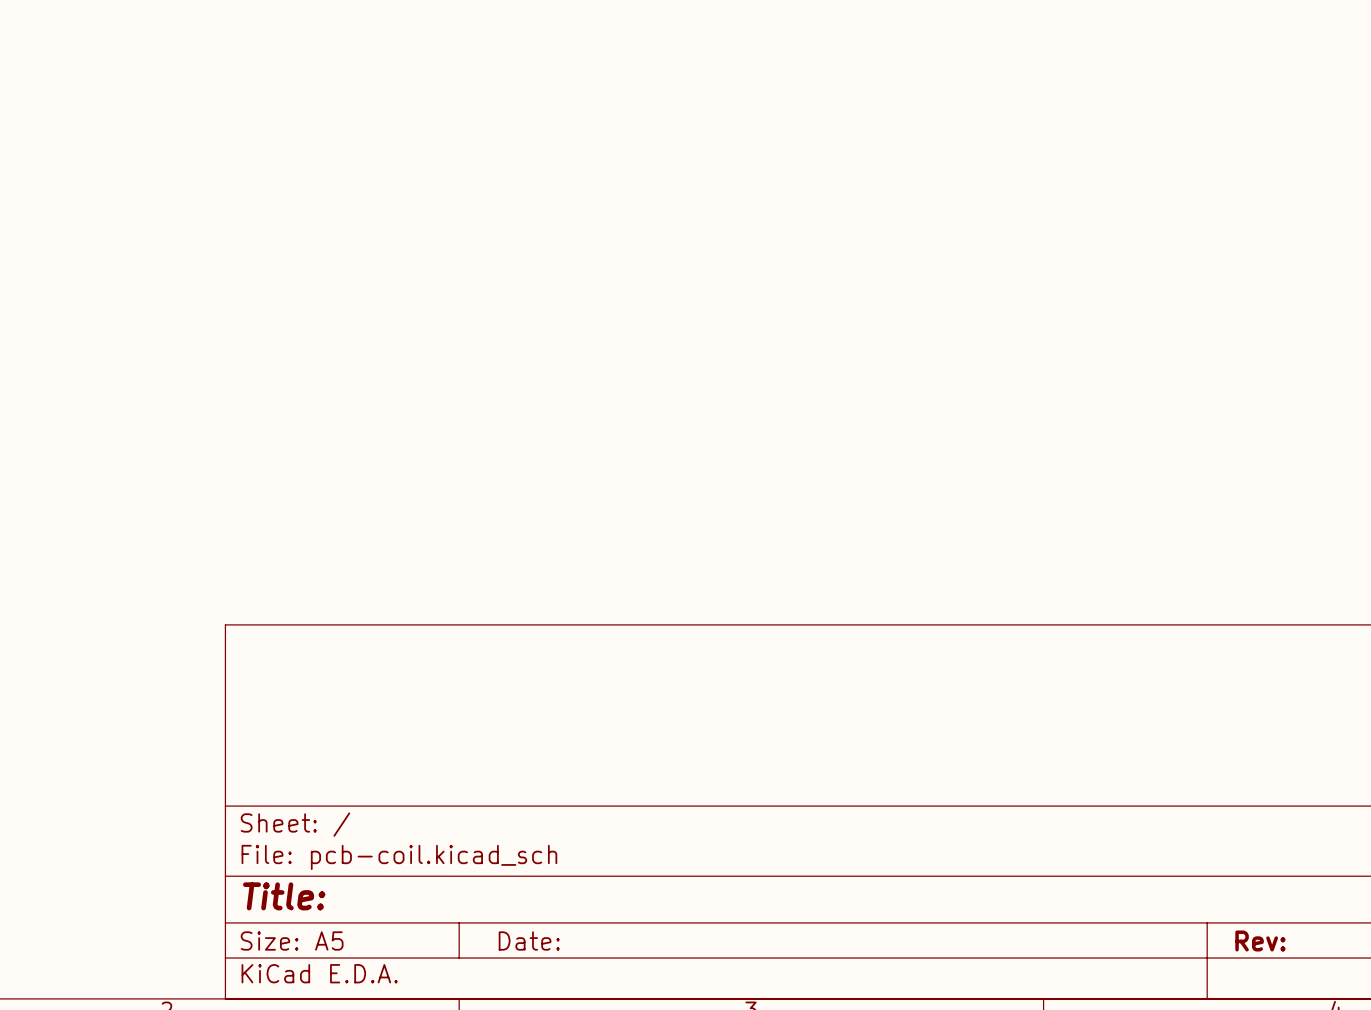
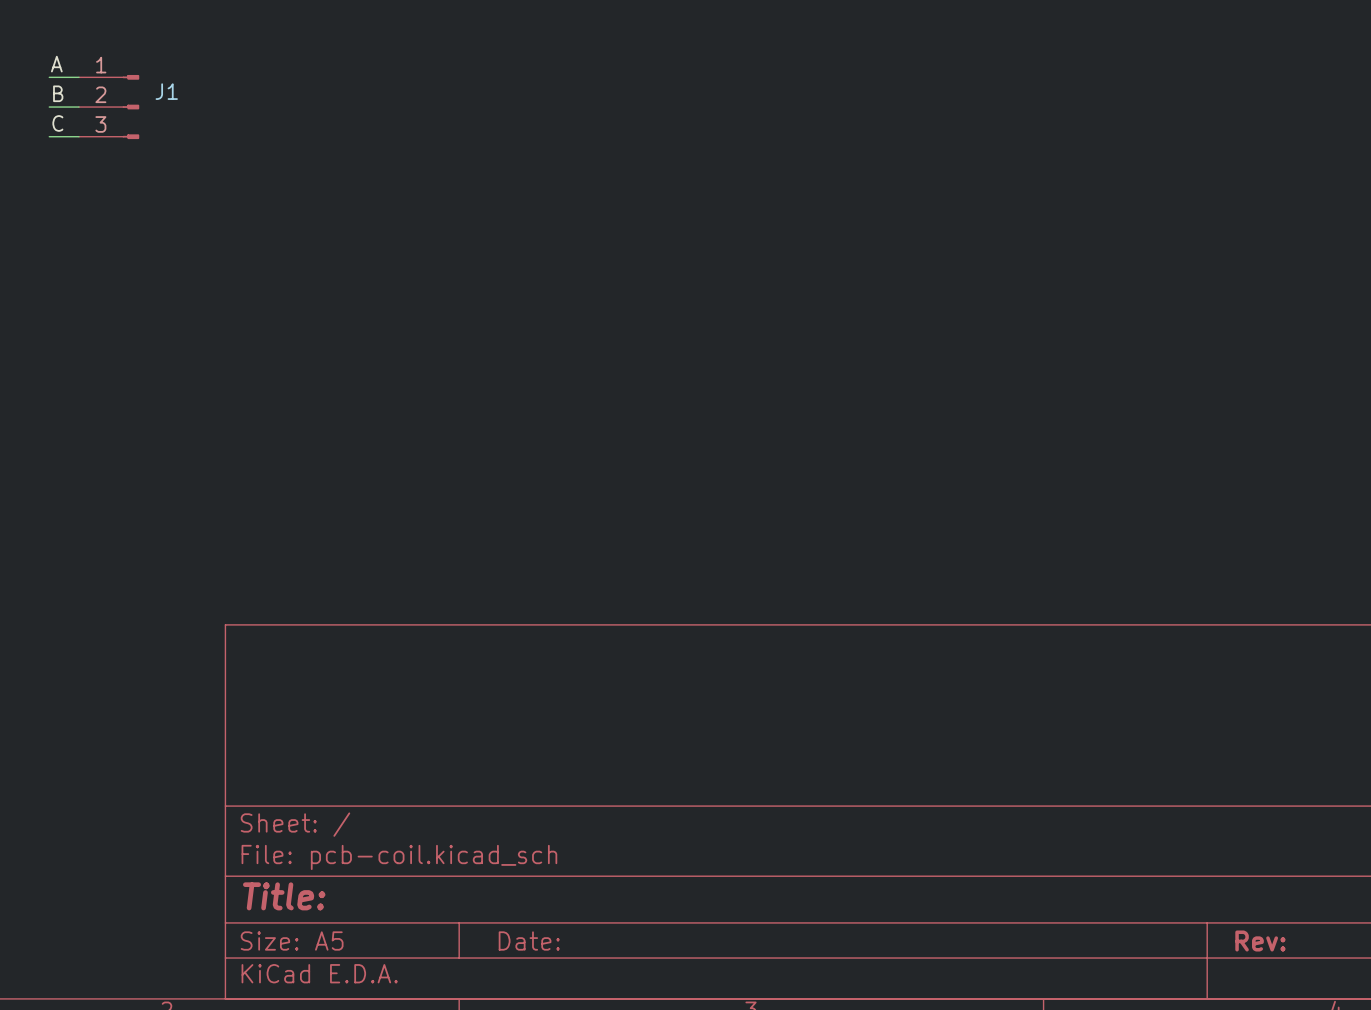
label: none -> A (56, 64)
wire: none -> (49, 77) (78, 77)
label: none -> B (58, 93)
wire: none -> (49, 107) (78, 107)
J1: none -> (109, 107)
label: none -> C (57, 123)
wire: none -> (49, 136) (78, 136)

